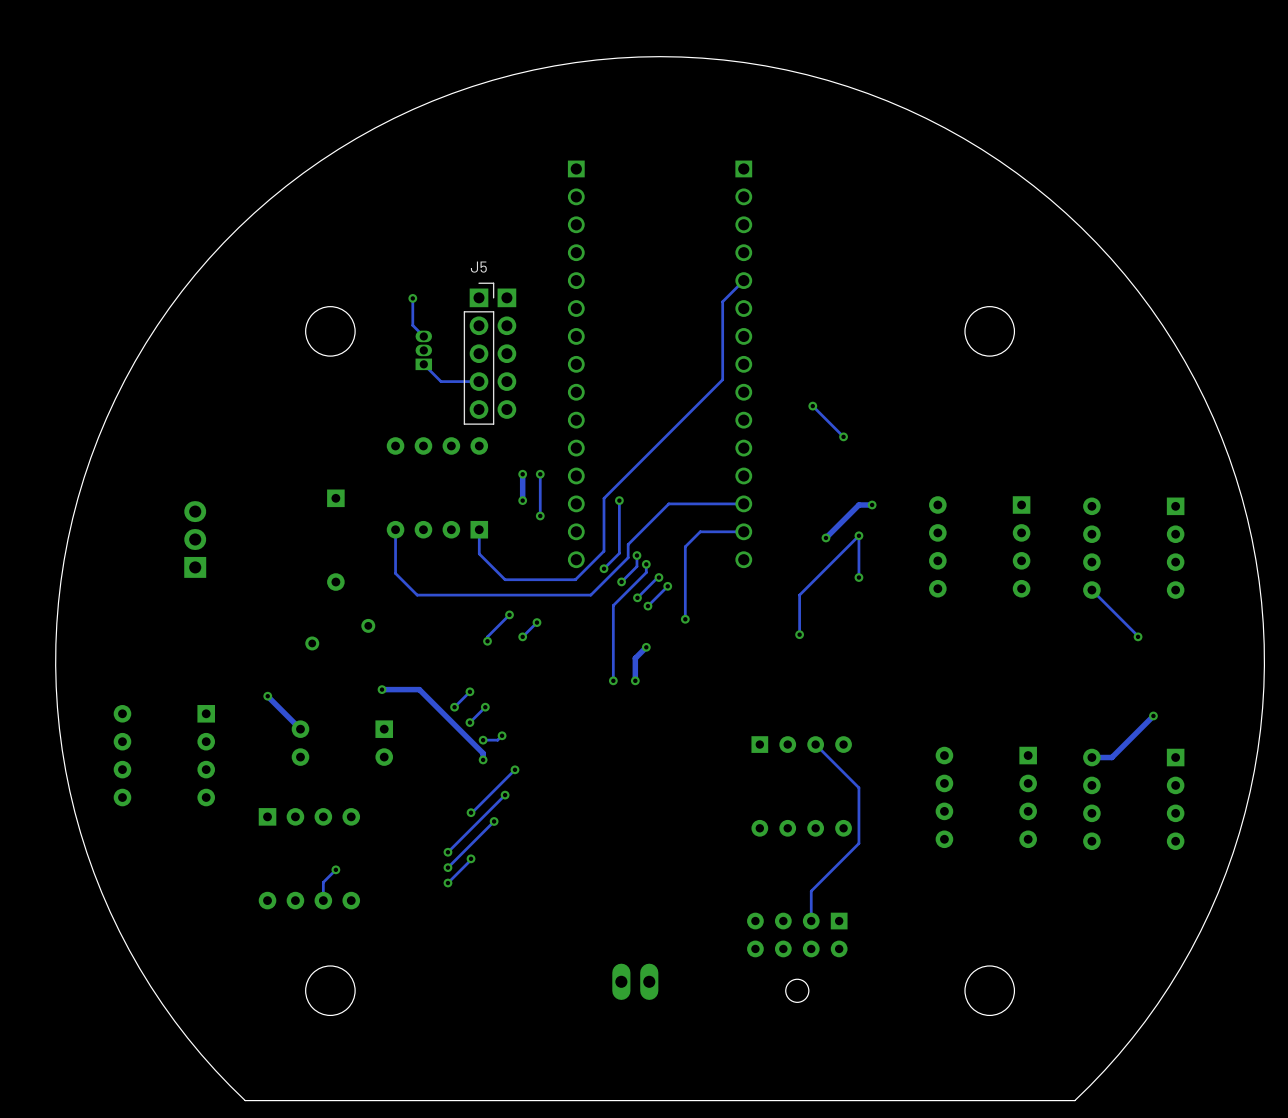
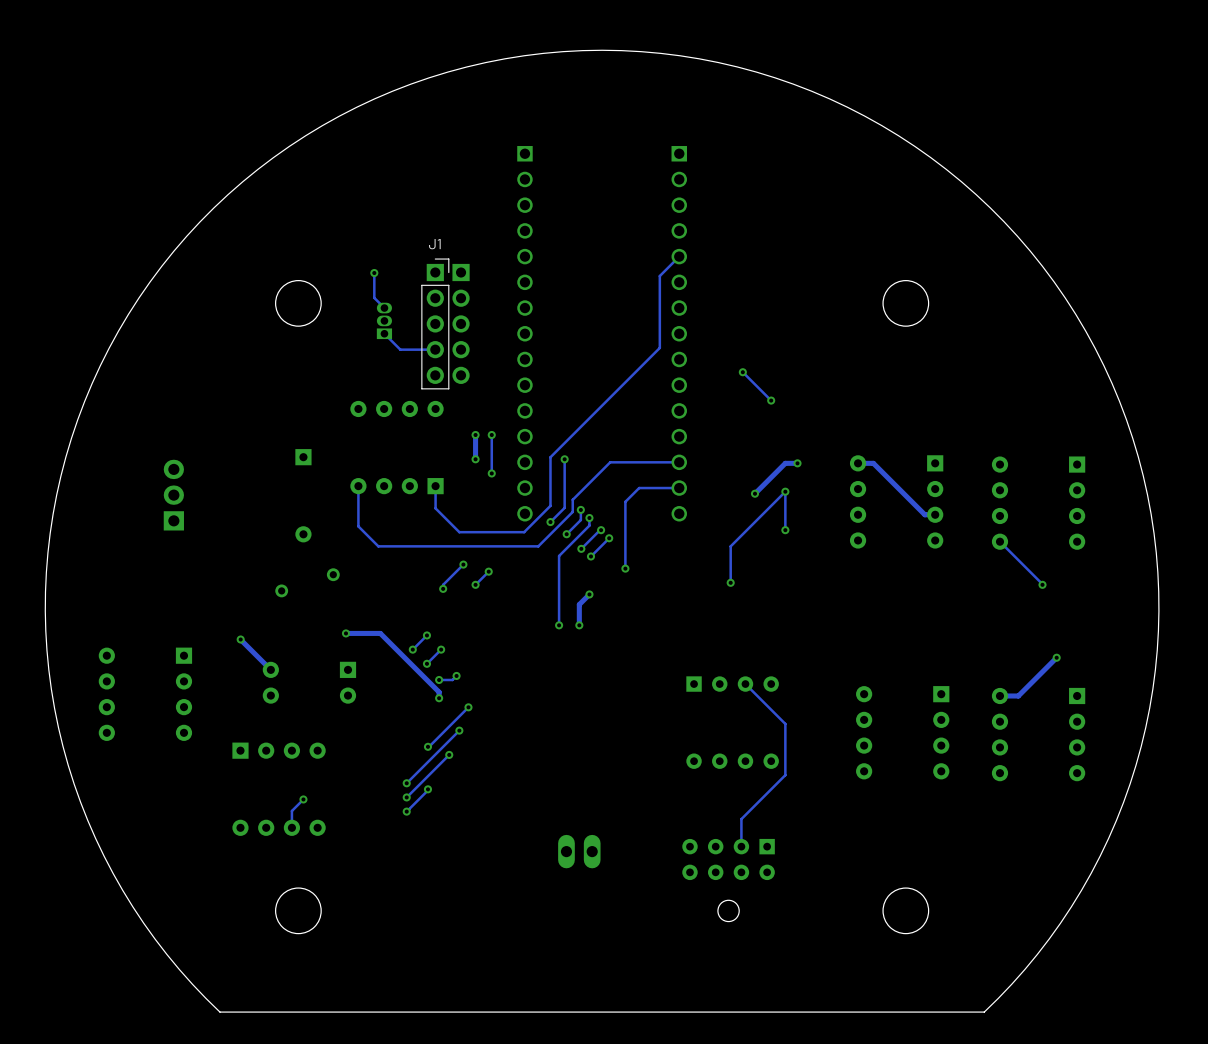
J5 name: J5 (478, 267) -> J1 (434, 244)
track: none -> (858, 463) (873, 463) (924, 514) (935, 514)
part position: (635, 981) -> (579, 851)

